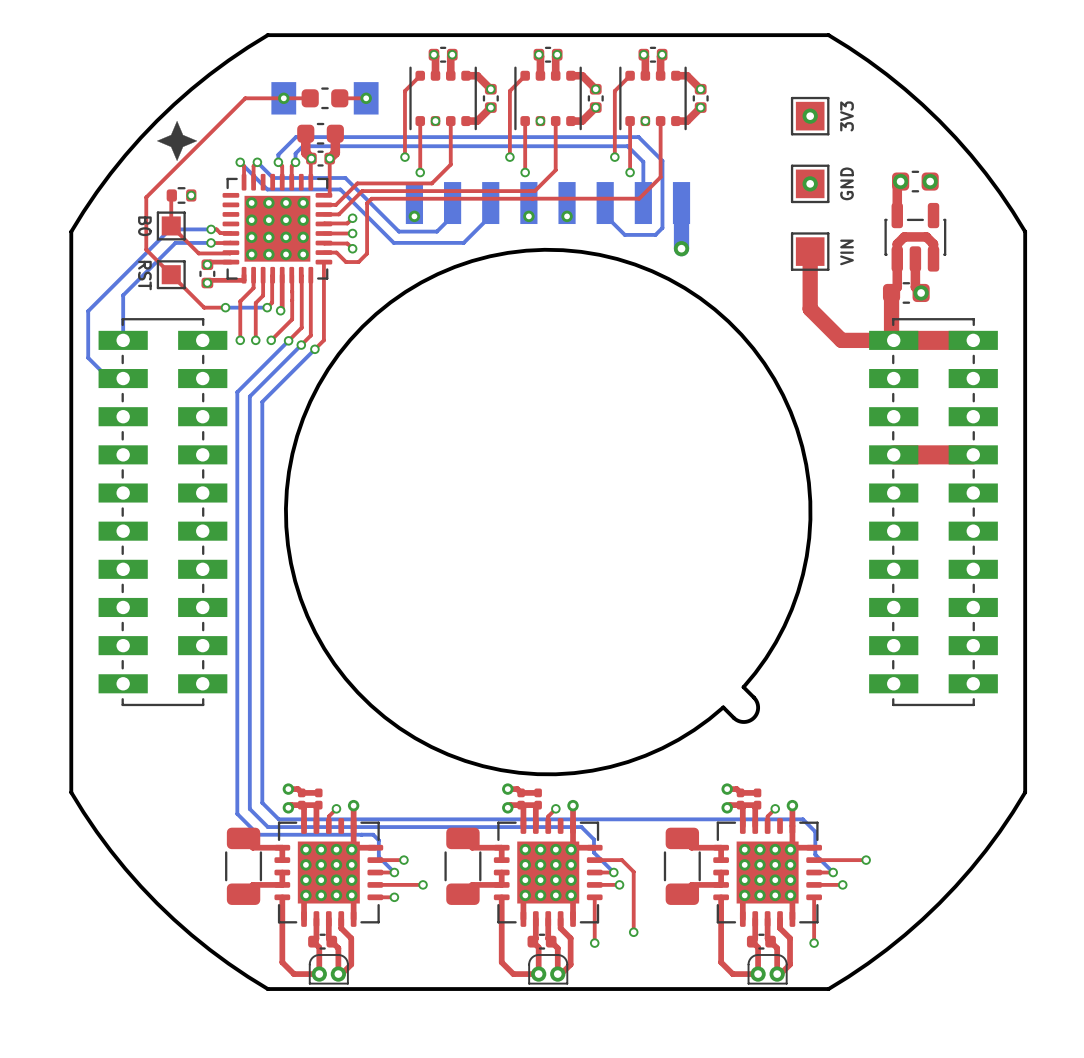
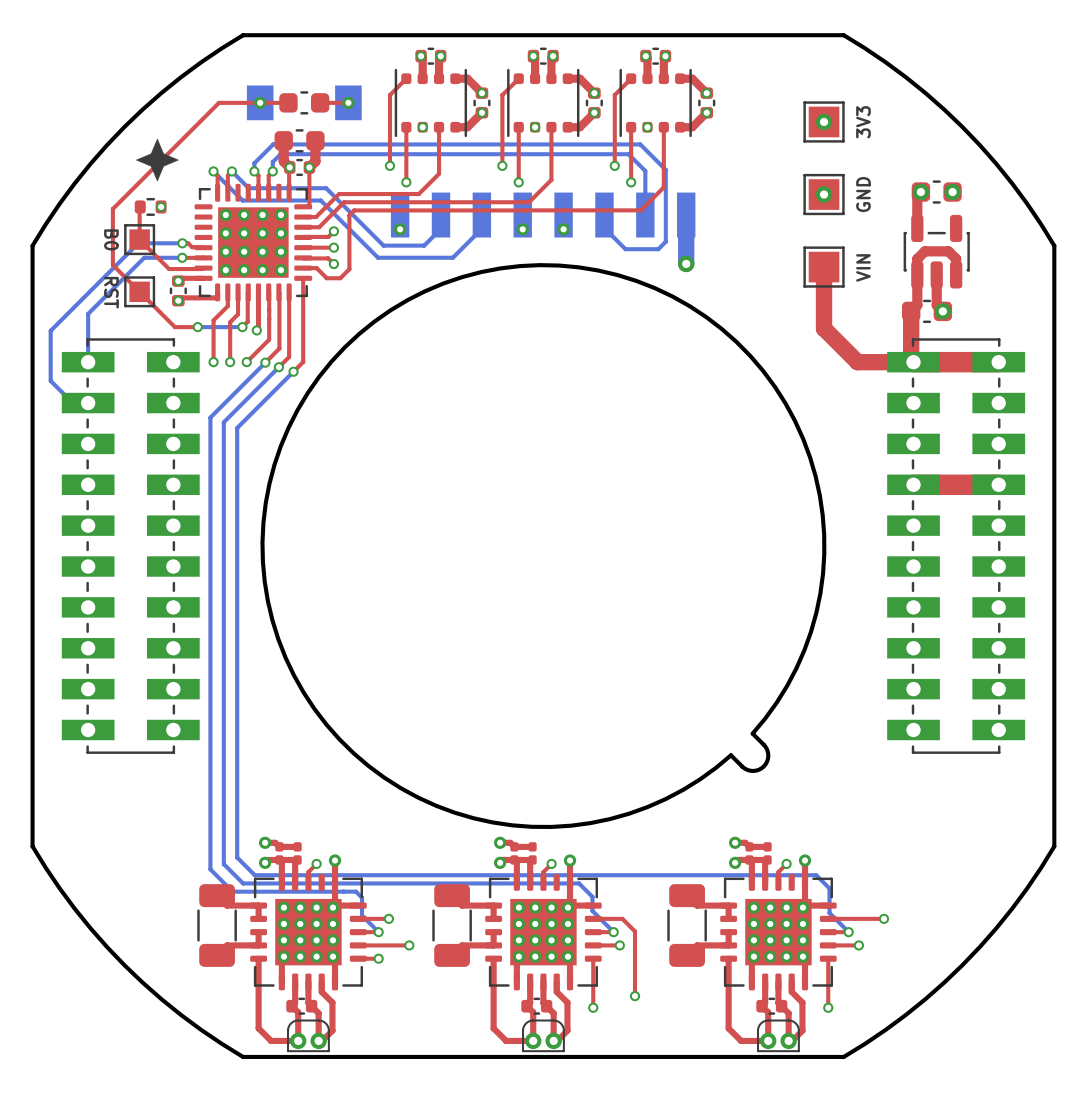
drawing position: (177, 140) -> (157, 160)

